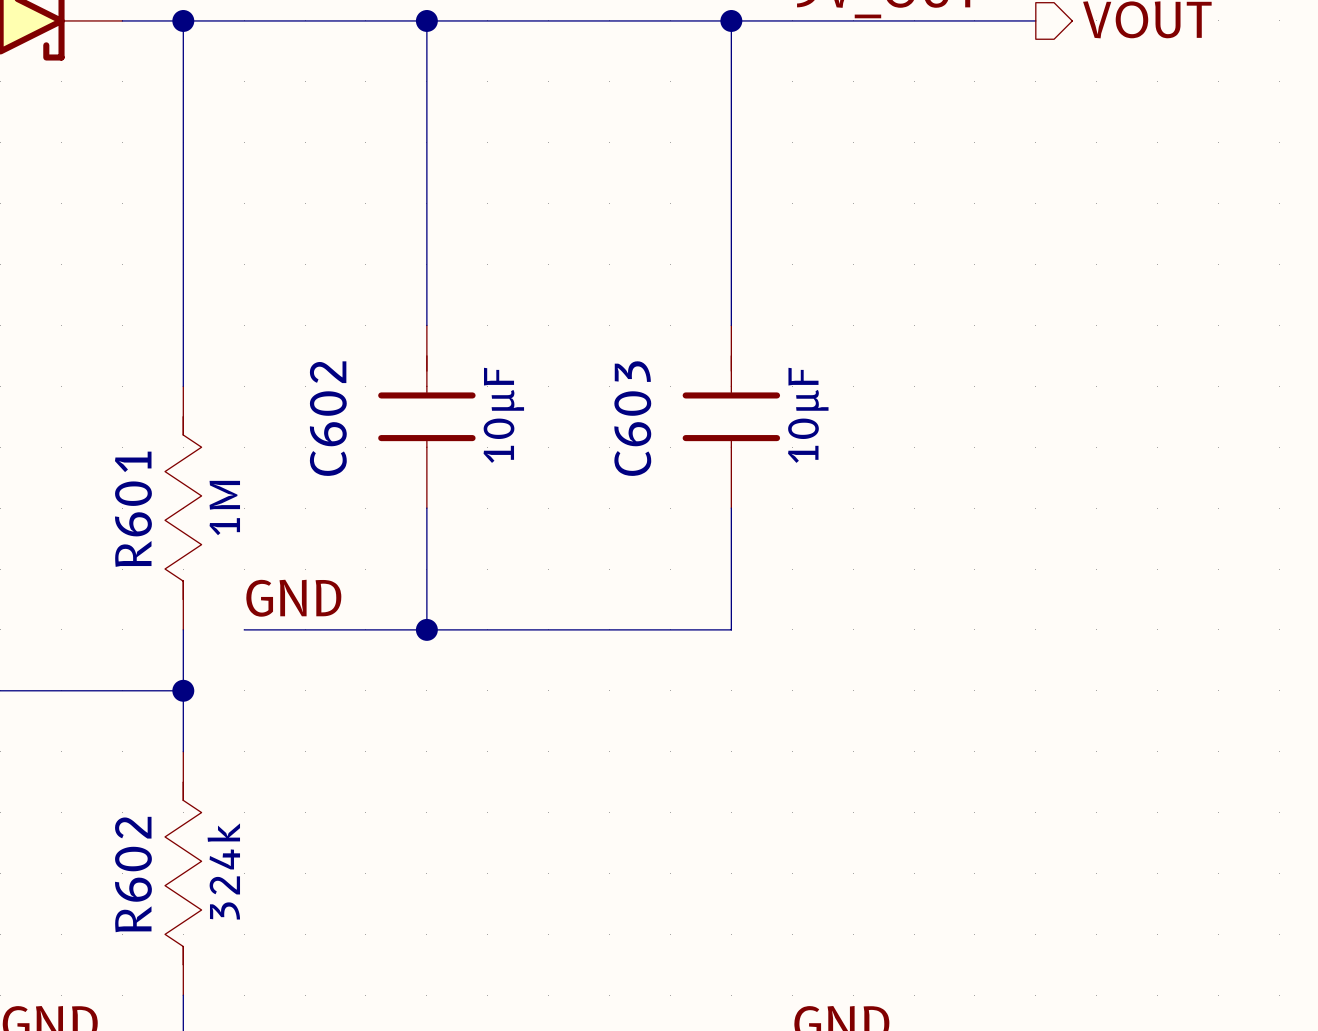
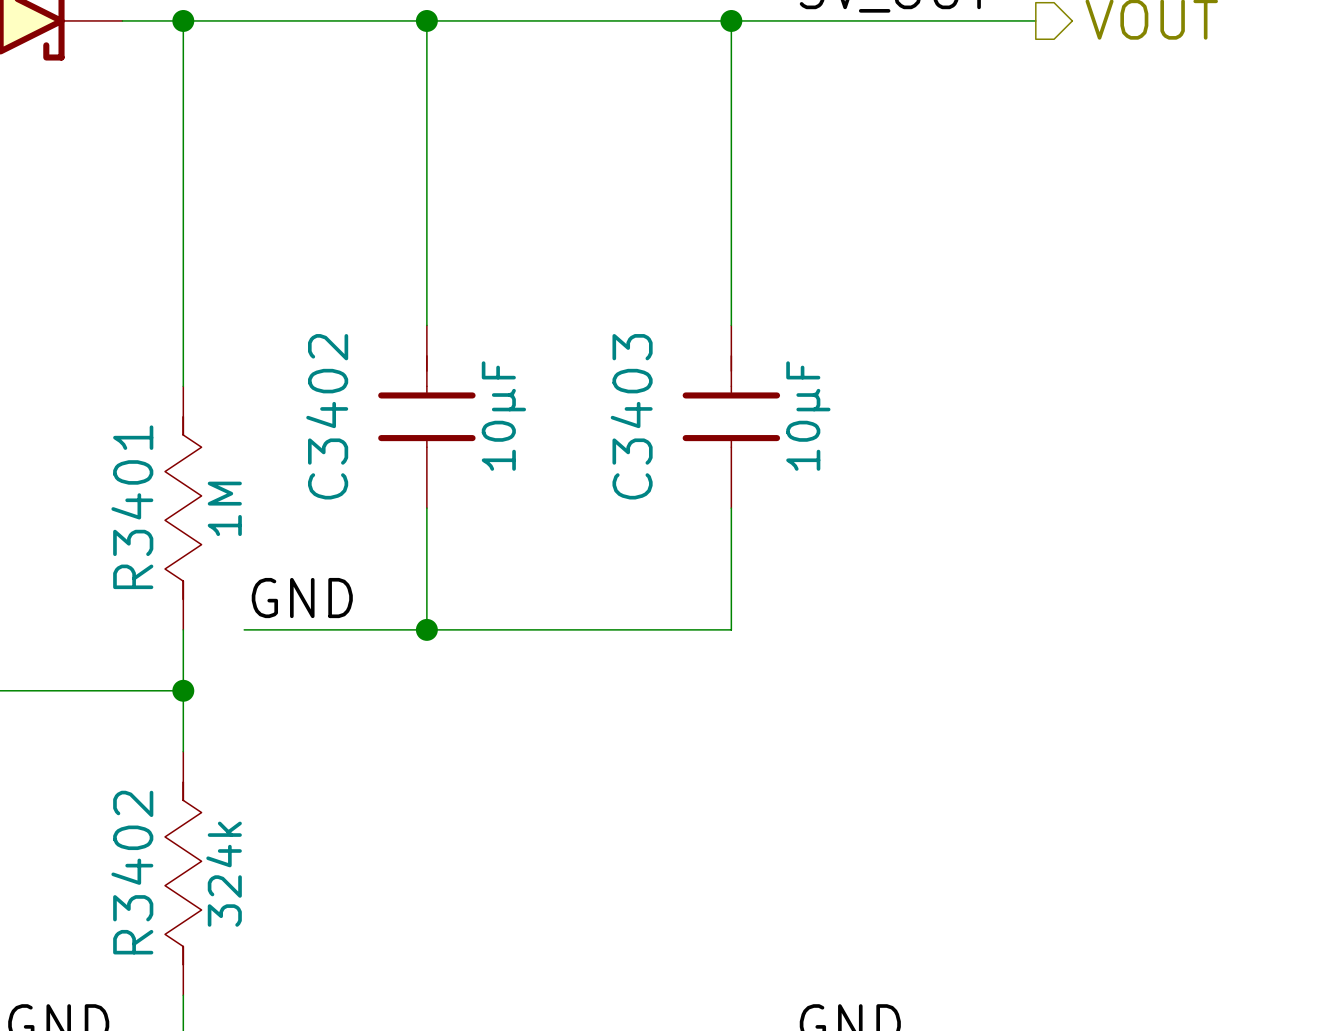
C602 name: C602 (328, 418) -> C3402 (327, 416)
C603 name: C603 (632, 418) -> C3403 (631, 416)
R601 name: R601 (133, 509) -> R3401 (132, 507)
R602 name: R602 (133, 874) -> R3402 (132, 872)

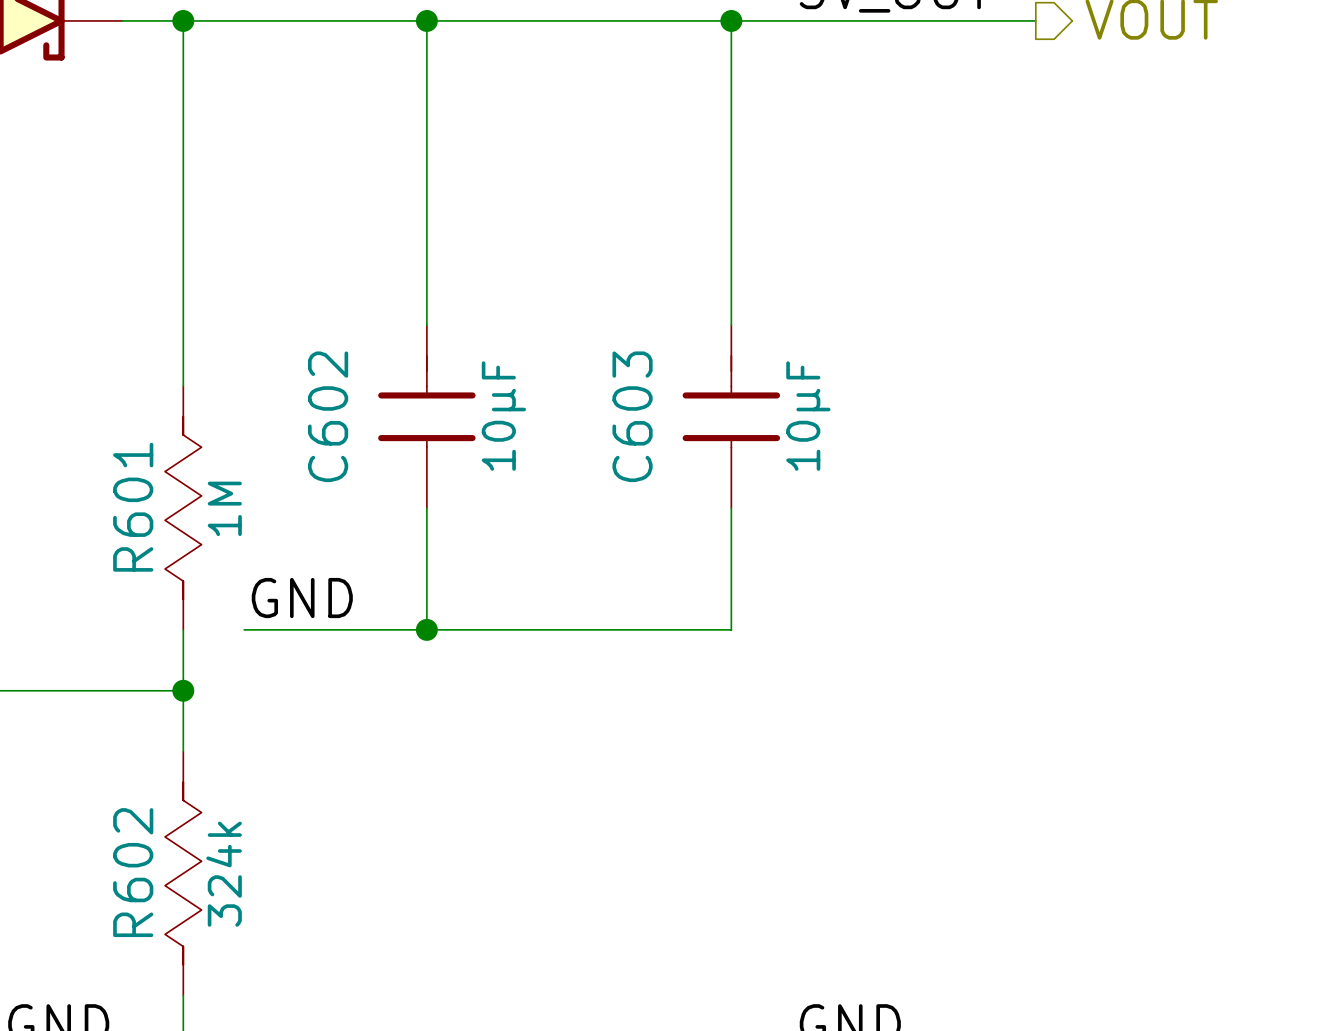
C3402 name: C3402 (327, 416) -> C602 (328, 416)
C3403 name: C3403 (631, 416) -> C603 (632, 416)
R3401 name: R3401 (132, 507) -> R601 (133, 507)
R3402 name: R3402 (132, 872) -> R602 (133, 872)

